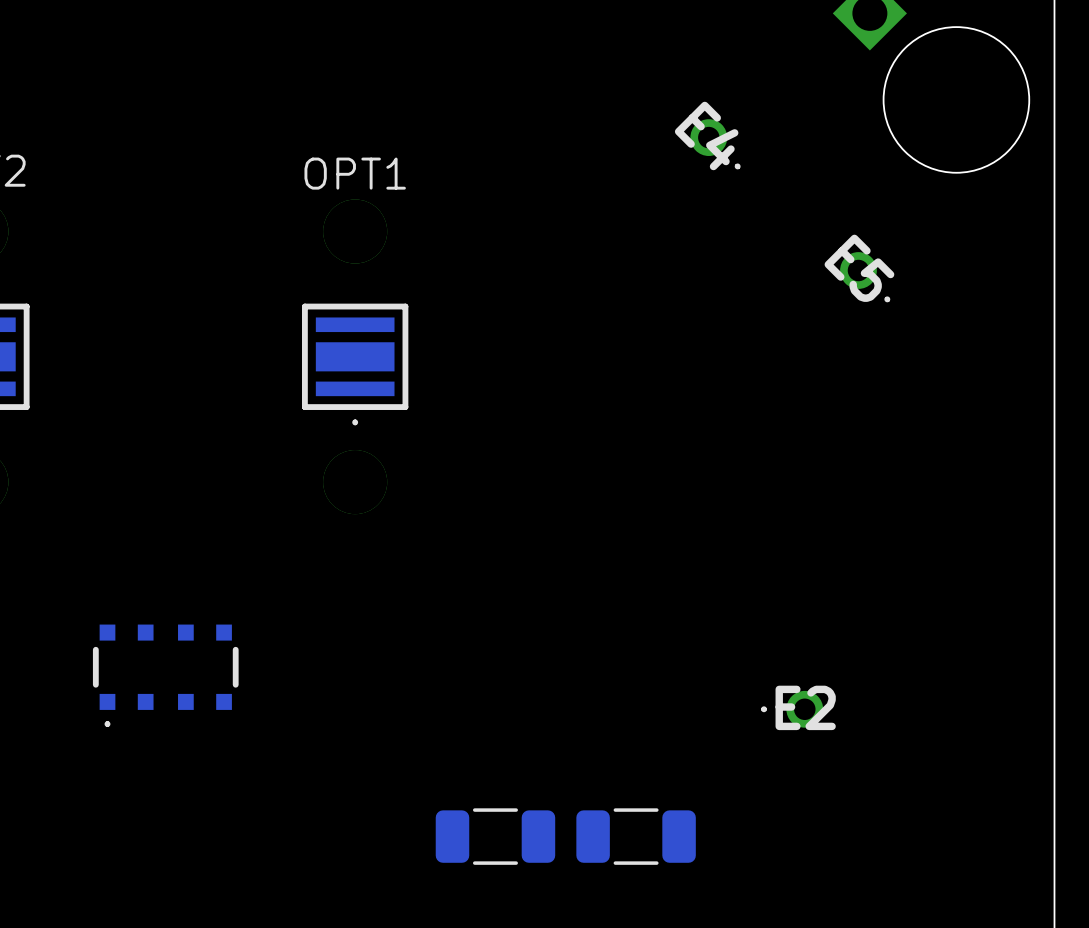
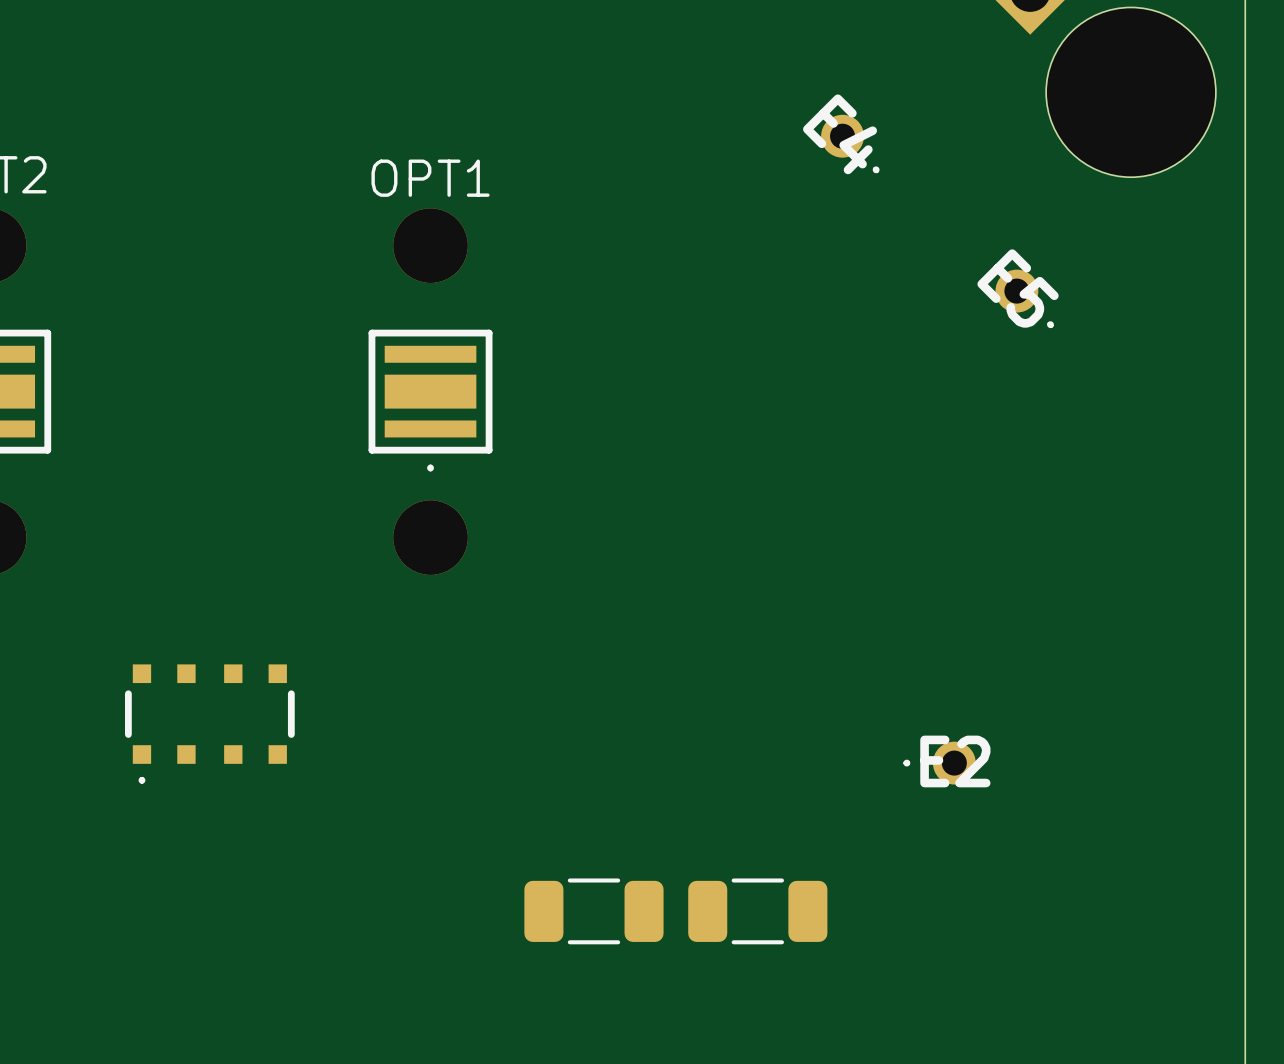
part position: (165, 675) -> (209, 724)
E2 position: (792, 709) -> (939, 763)
part position: (495, 836) -> (593, 911)
part position: (636, 836) -> (757, 911)

